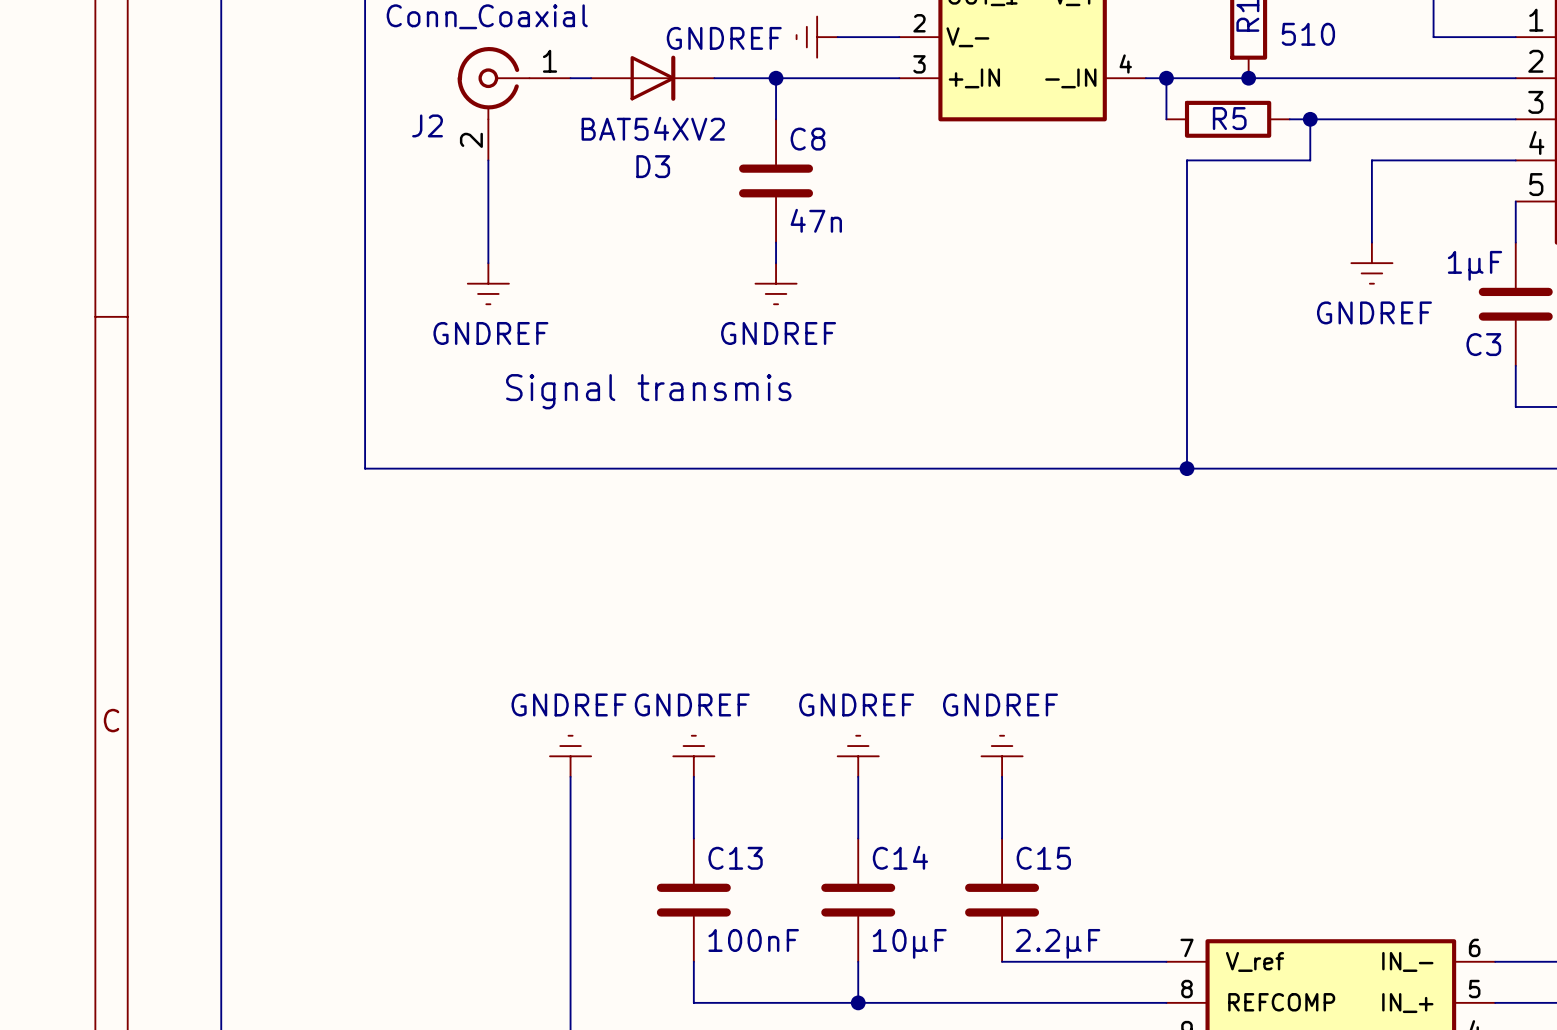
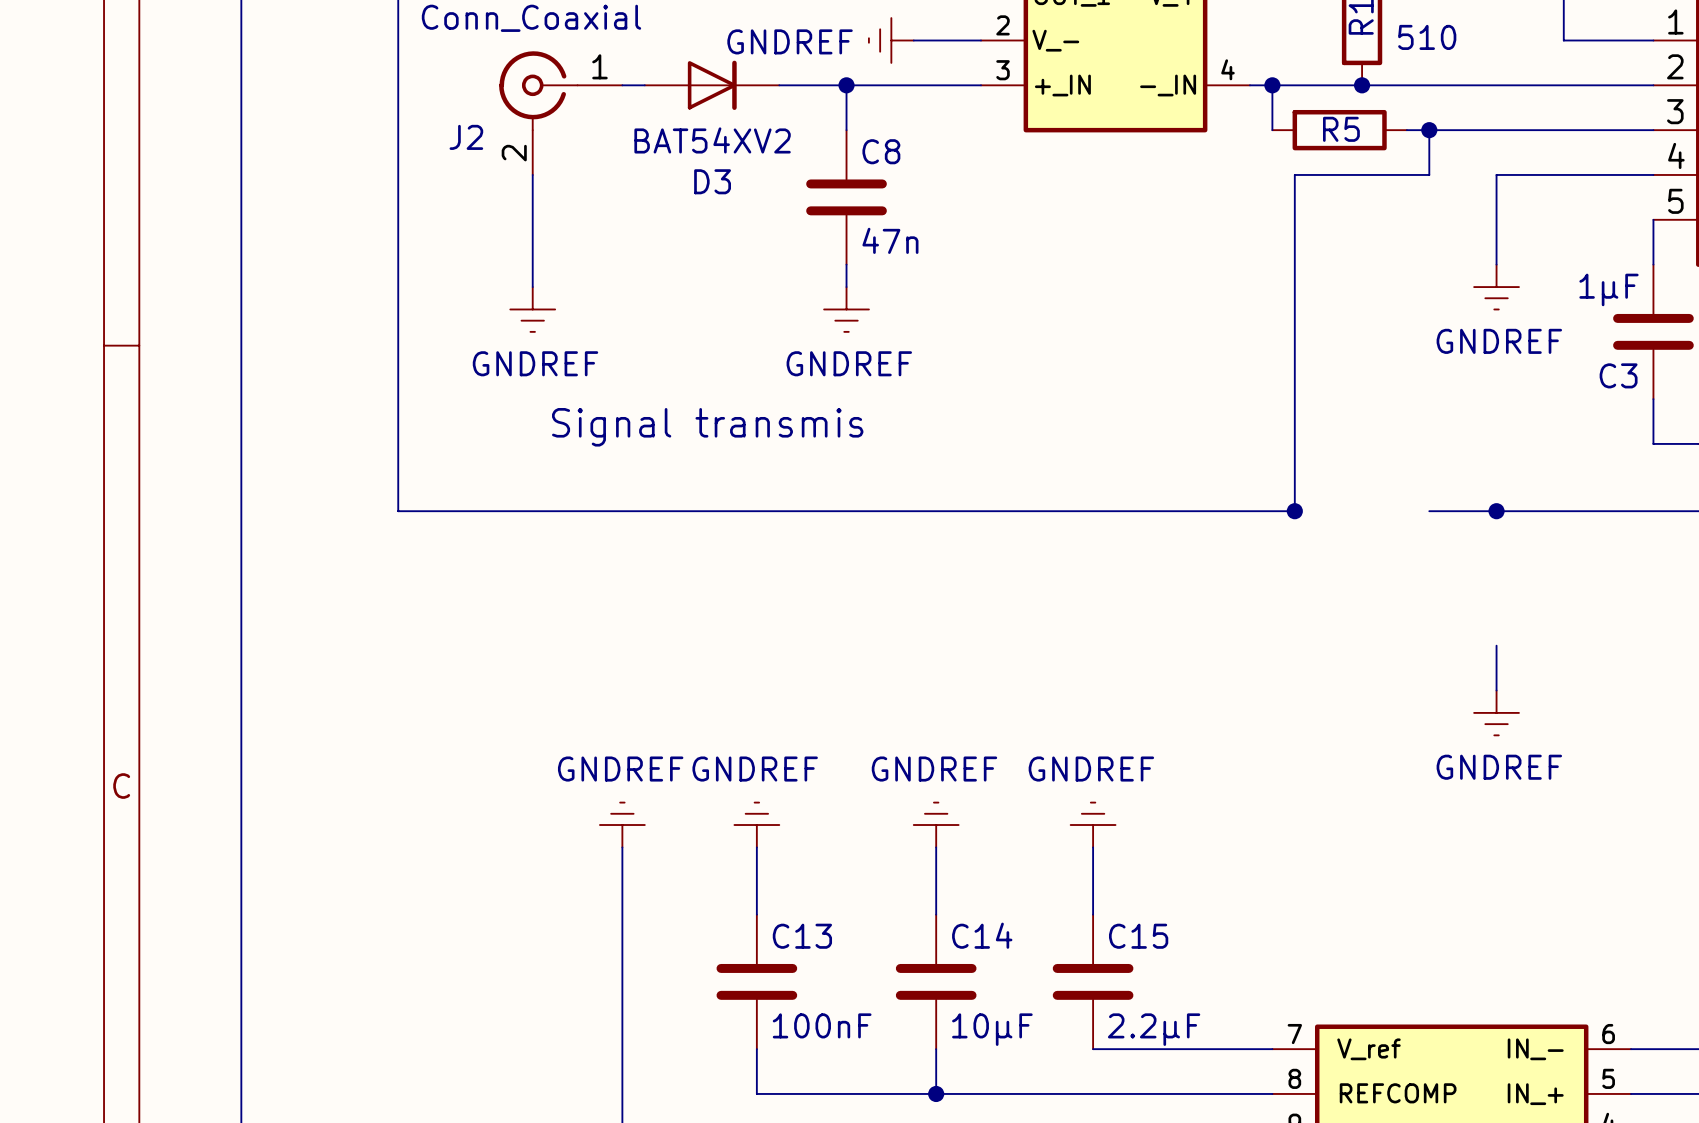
wire: (1186, 468) (1310, 468) -> none
junction: none -> (1496, 511)
wire: none -> (1496, 645) (1496, 690)
power symbol: none -> GNDREF (1496, 712)

